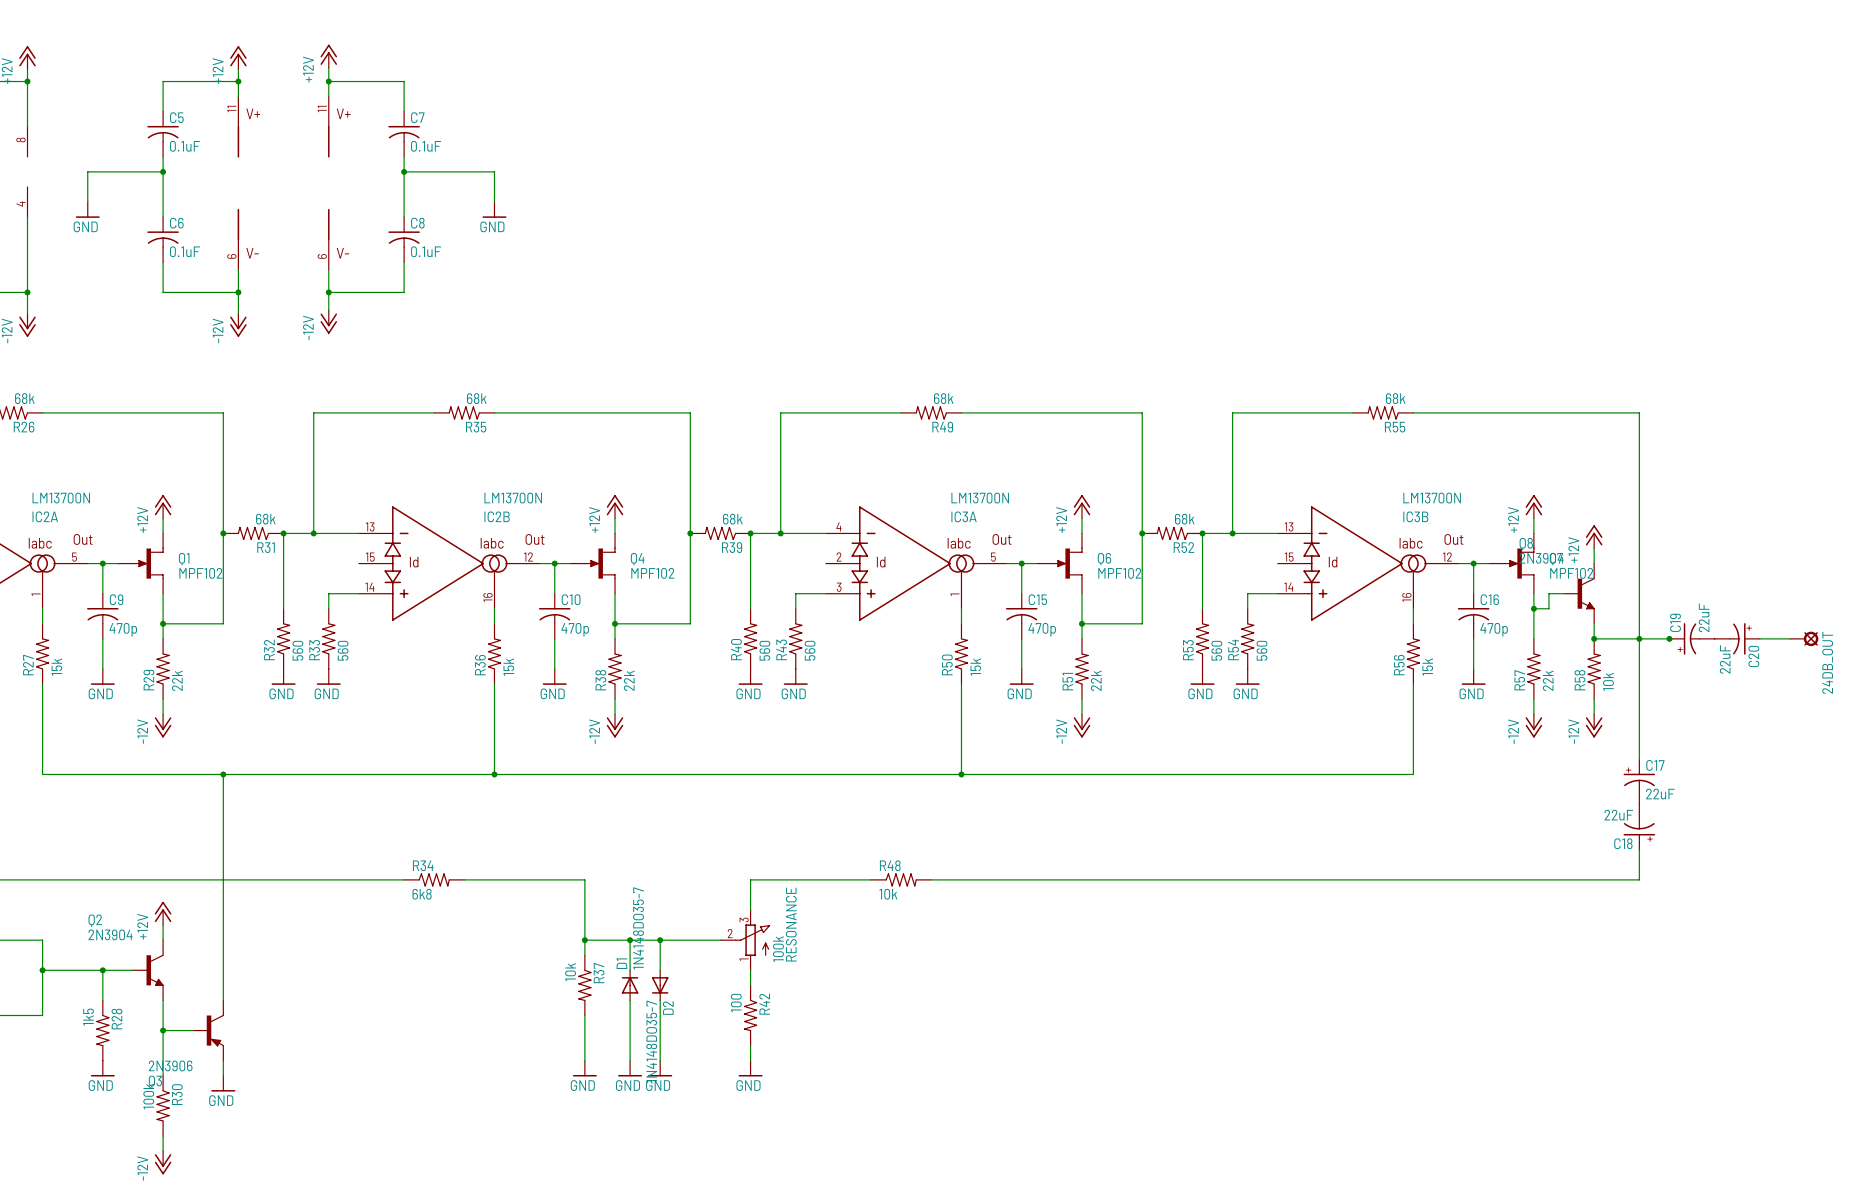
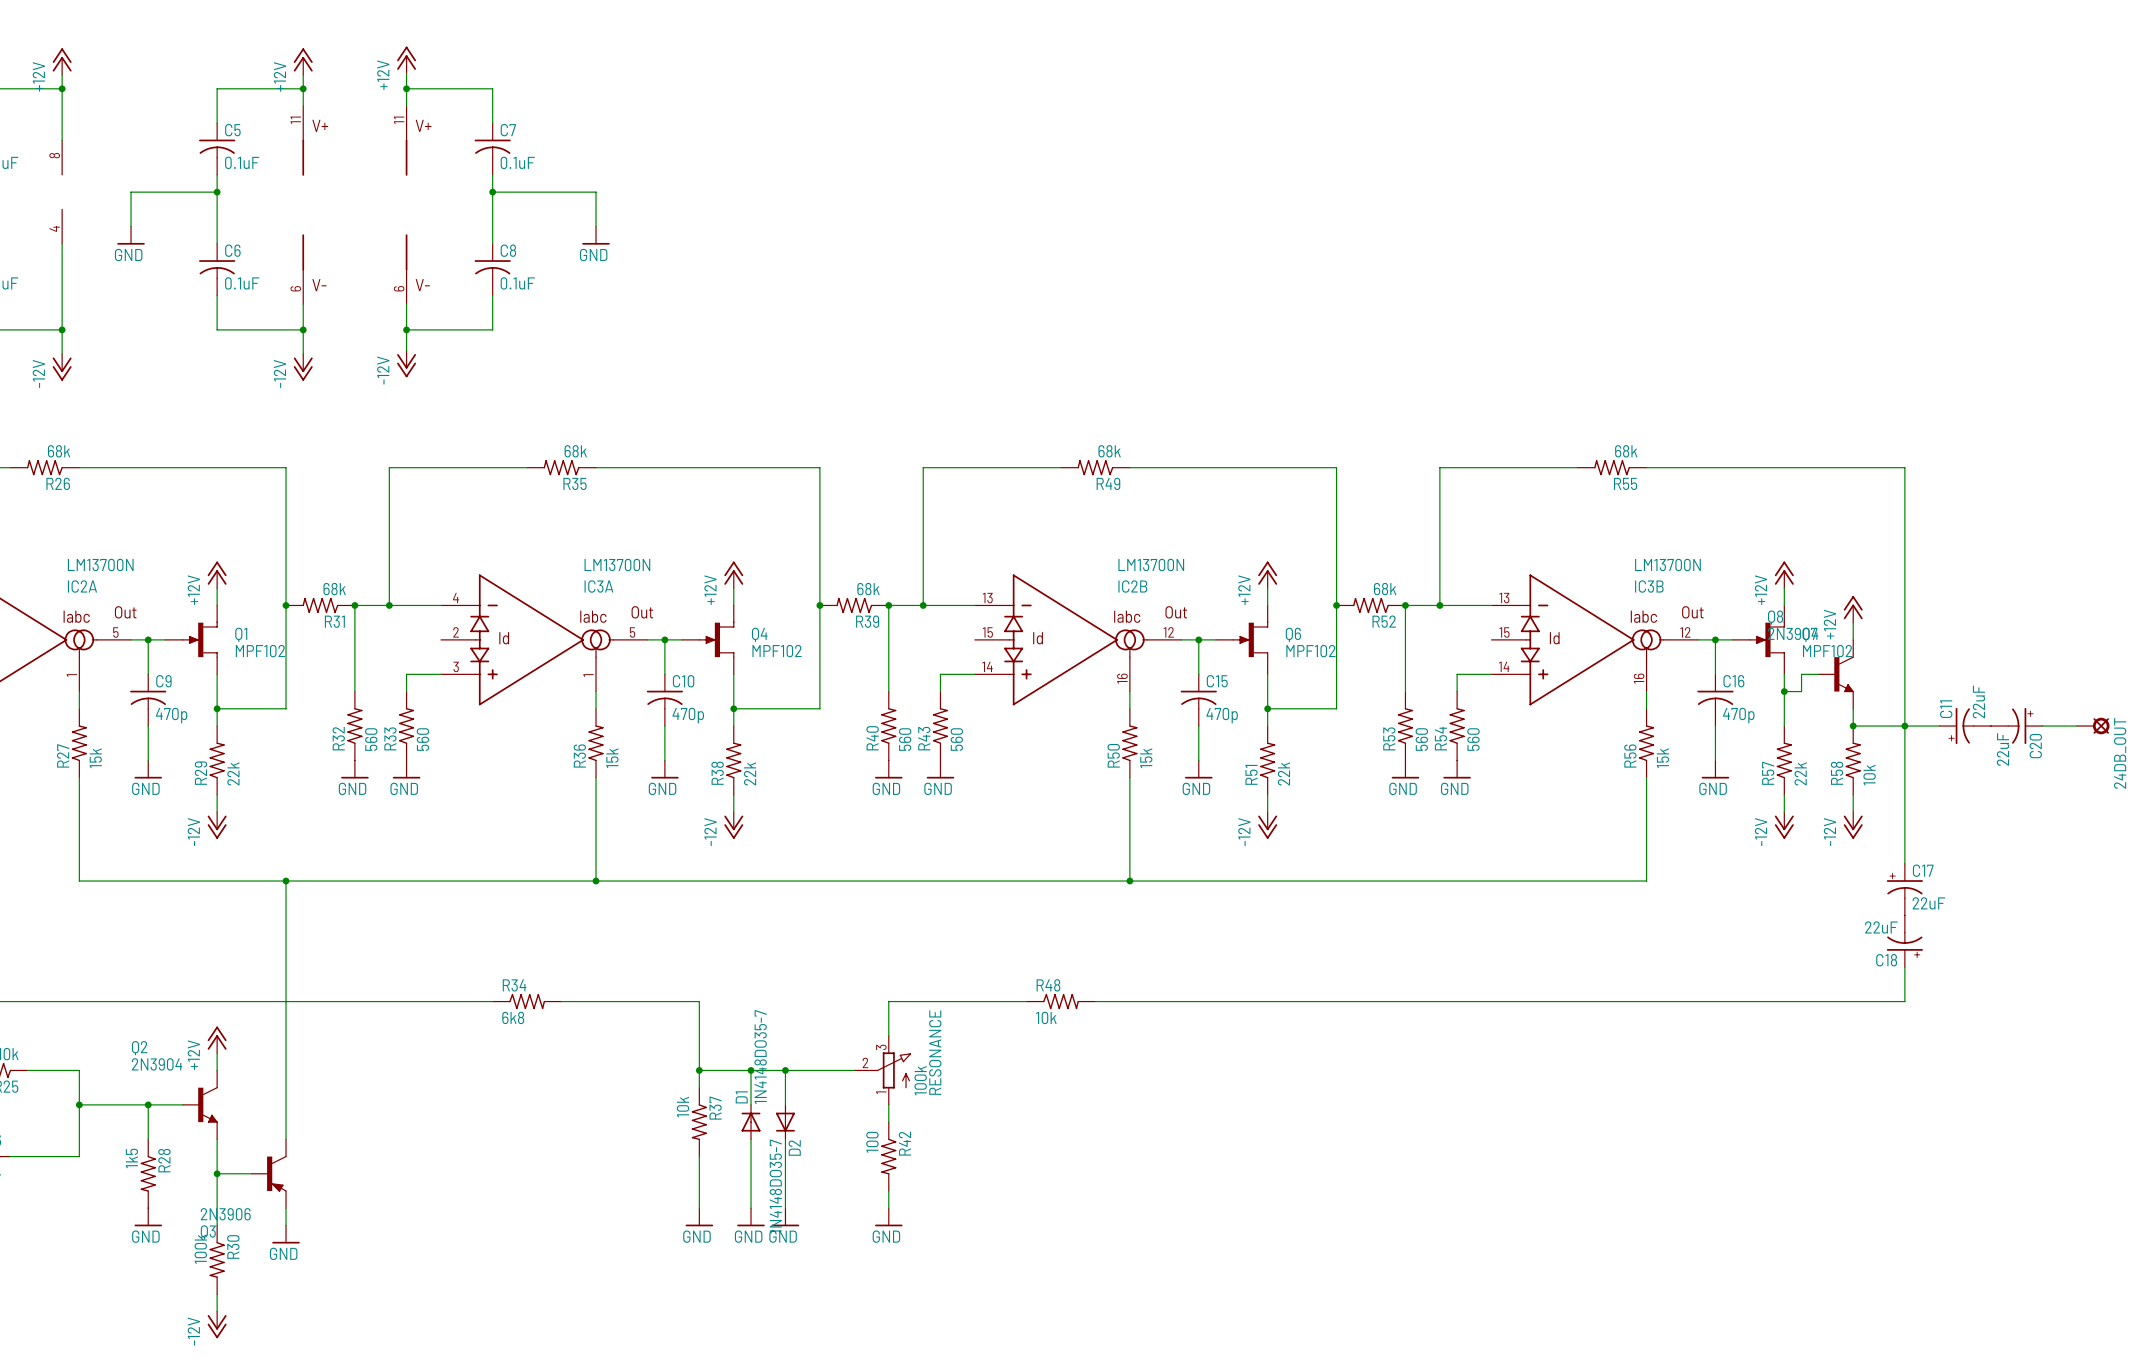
IC2B position: (449, 563) -> (1078, 639)
IC3A position: (916, 563) -> (544, 639)
C19 name: C19 (1675, 622) -> C11 (1946, 709)
junction: (1669, 638) -> none

